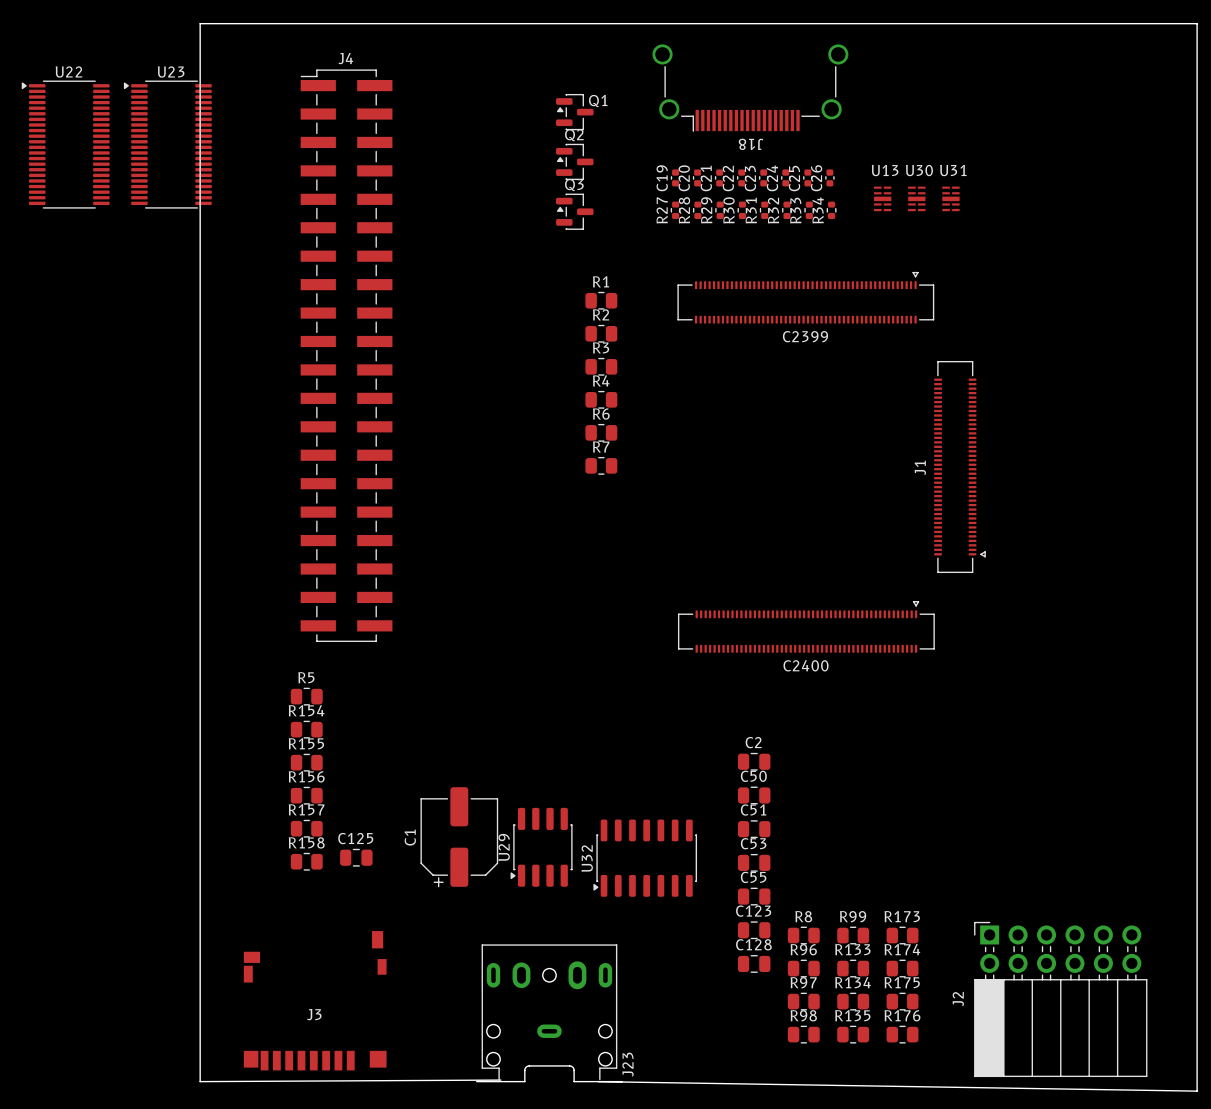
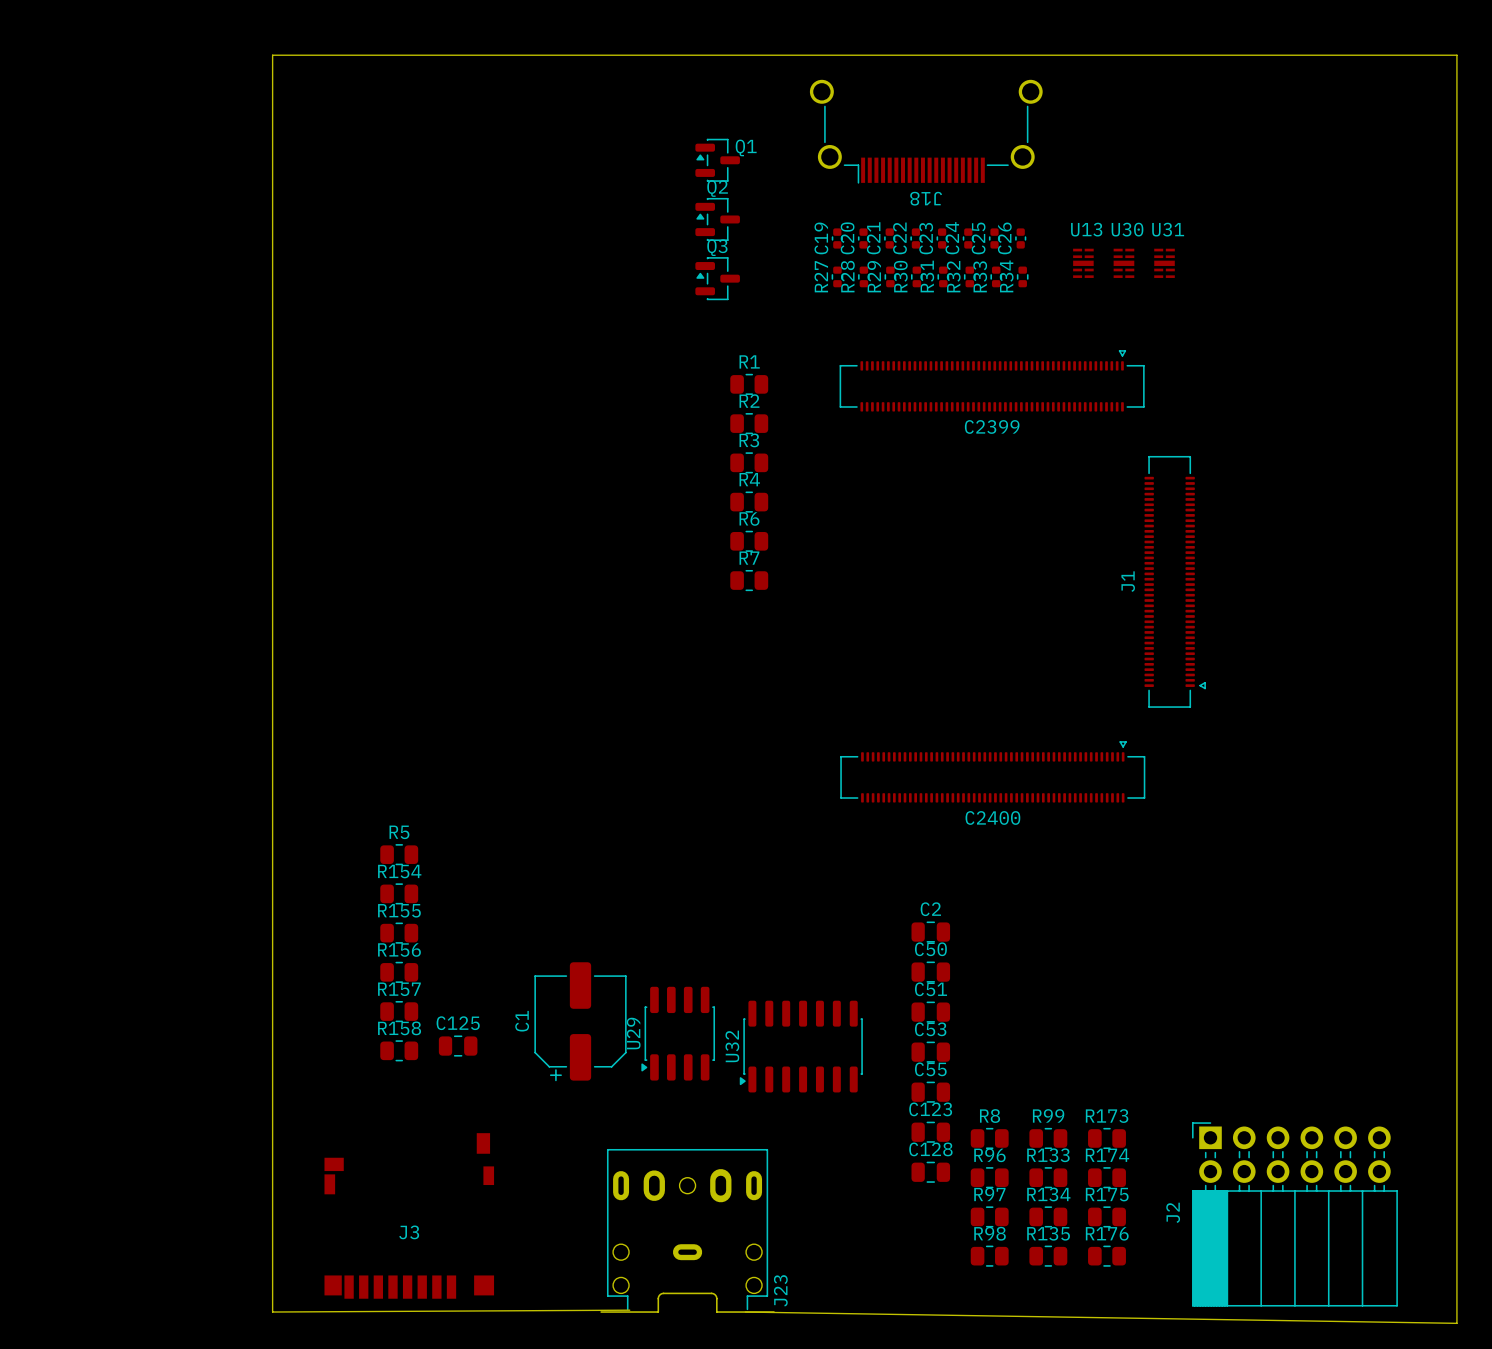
U22: (65, 144) -> none
U23: (167, 144) -> none
J4: (346, 355) -> none

